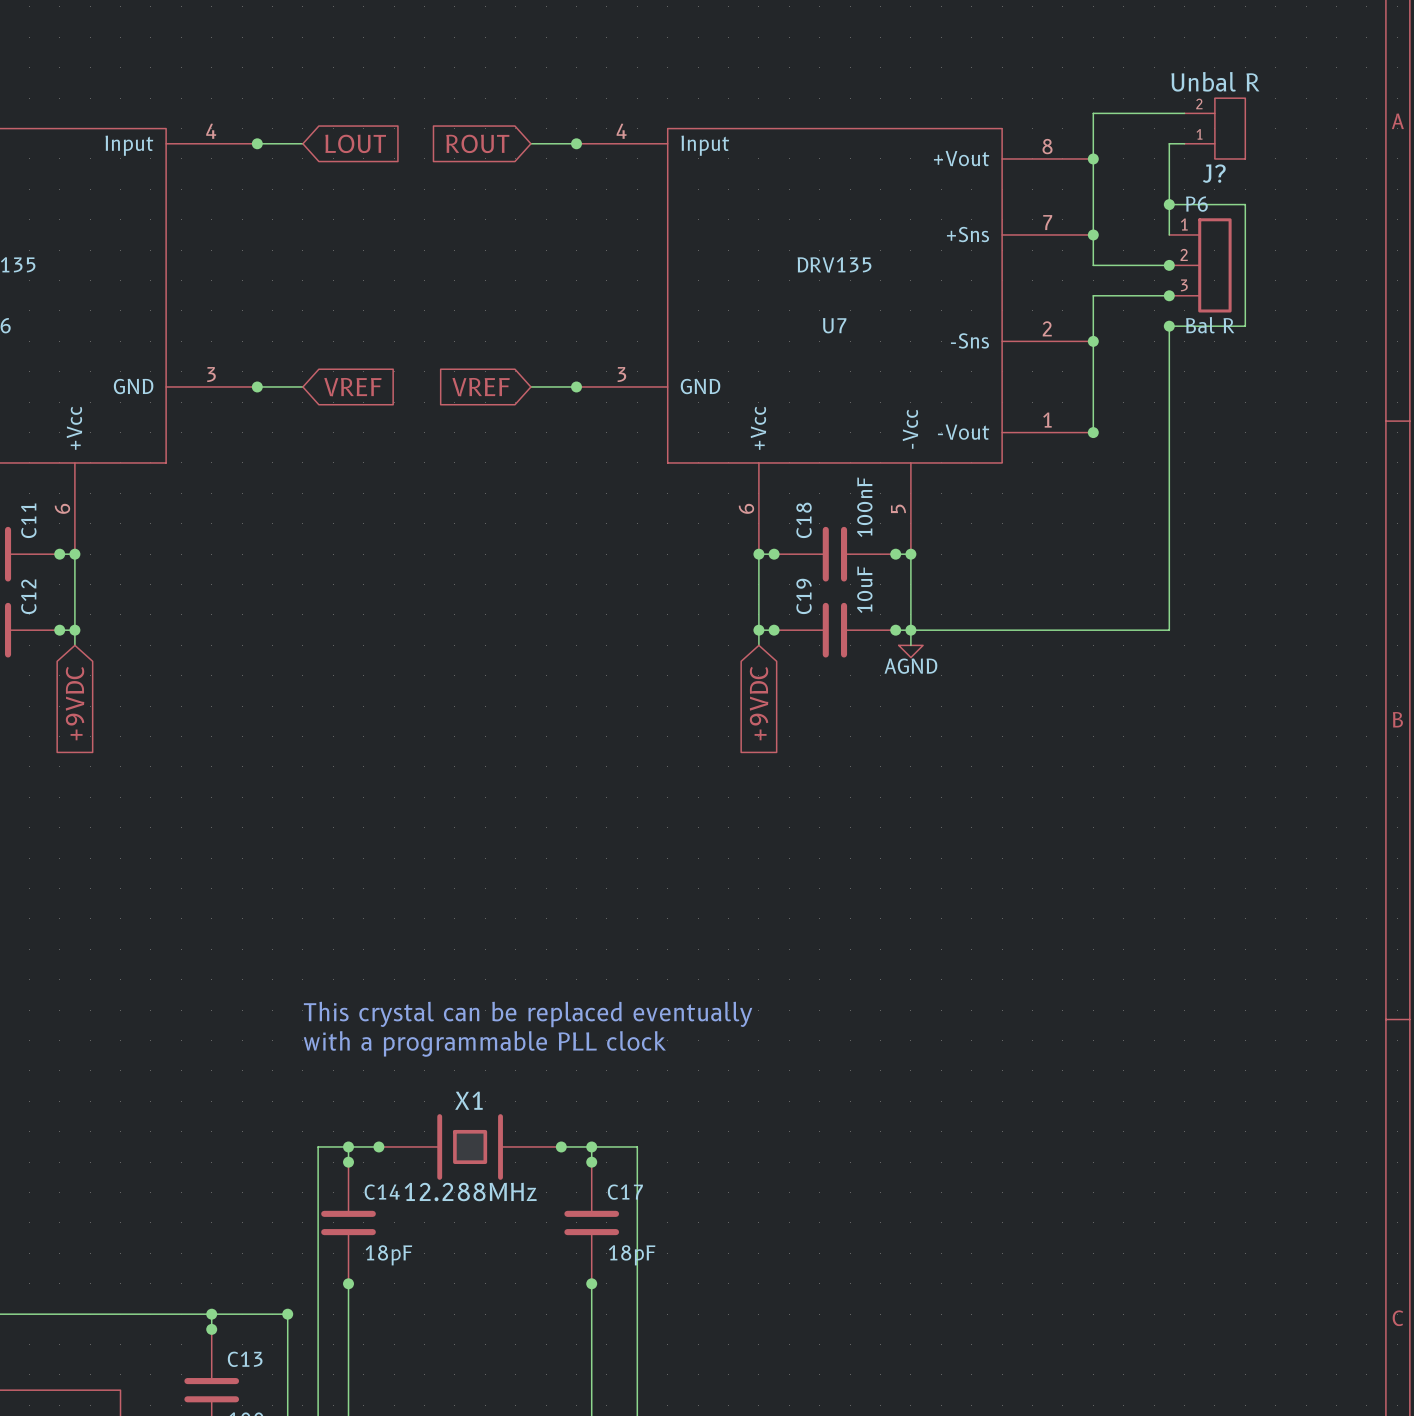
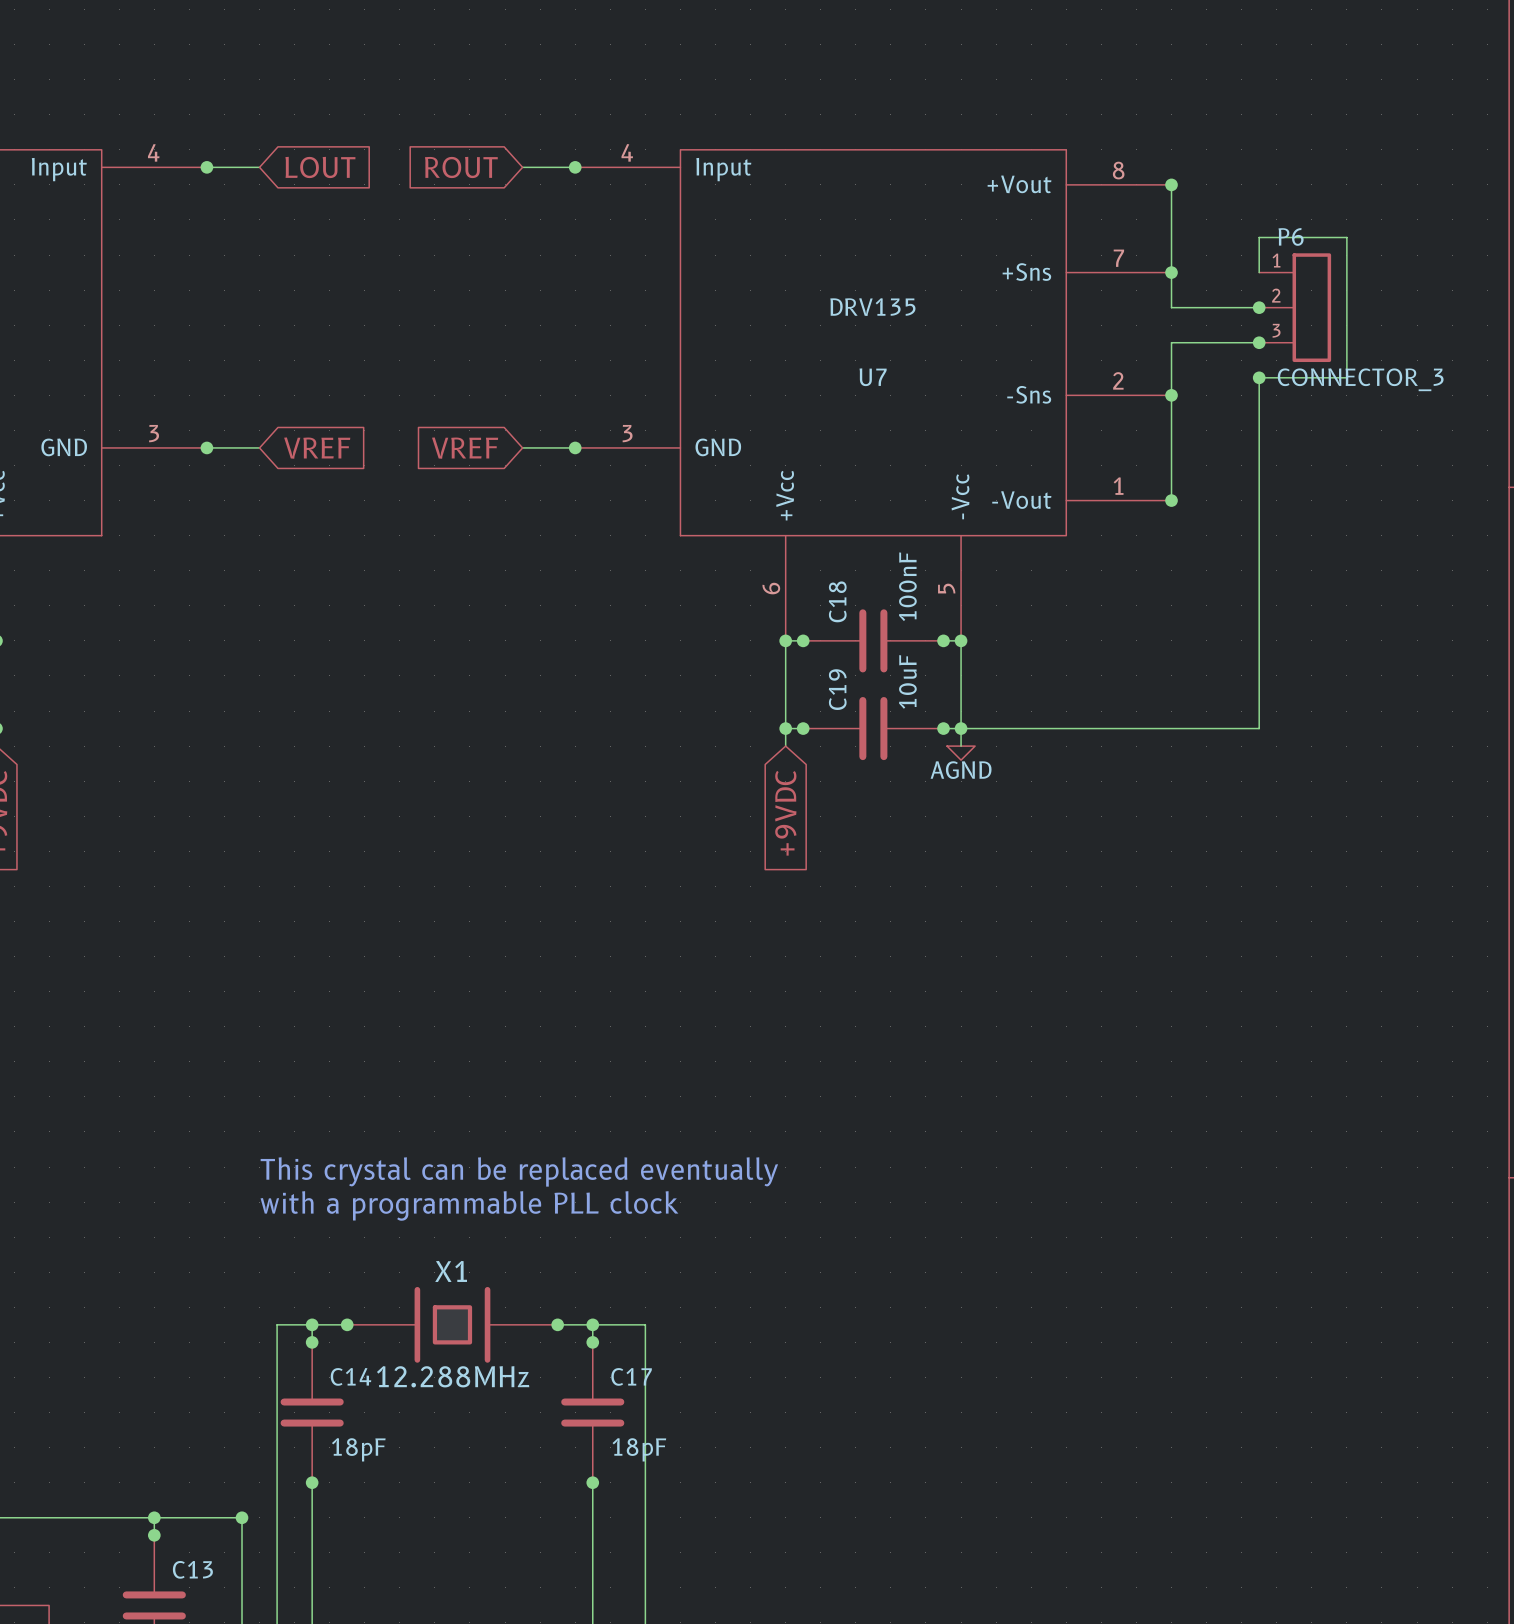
wire: (1184, 113) (1093, 113) (1093, 158) -> none
J?: Unbal R (1214, 128) -> none
wire: (1184, 143) (1169, 143) (1169, 204) -> none
junction: (1169, 204) -> none
P6 value: Bal R (1210, 325) -> CONNECTOR_3 (1360, 379)

